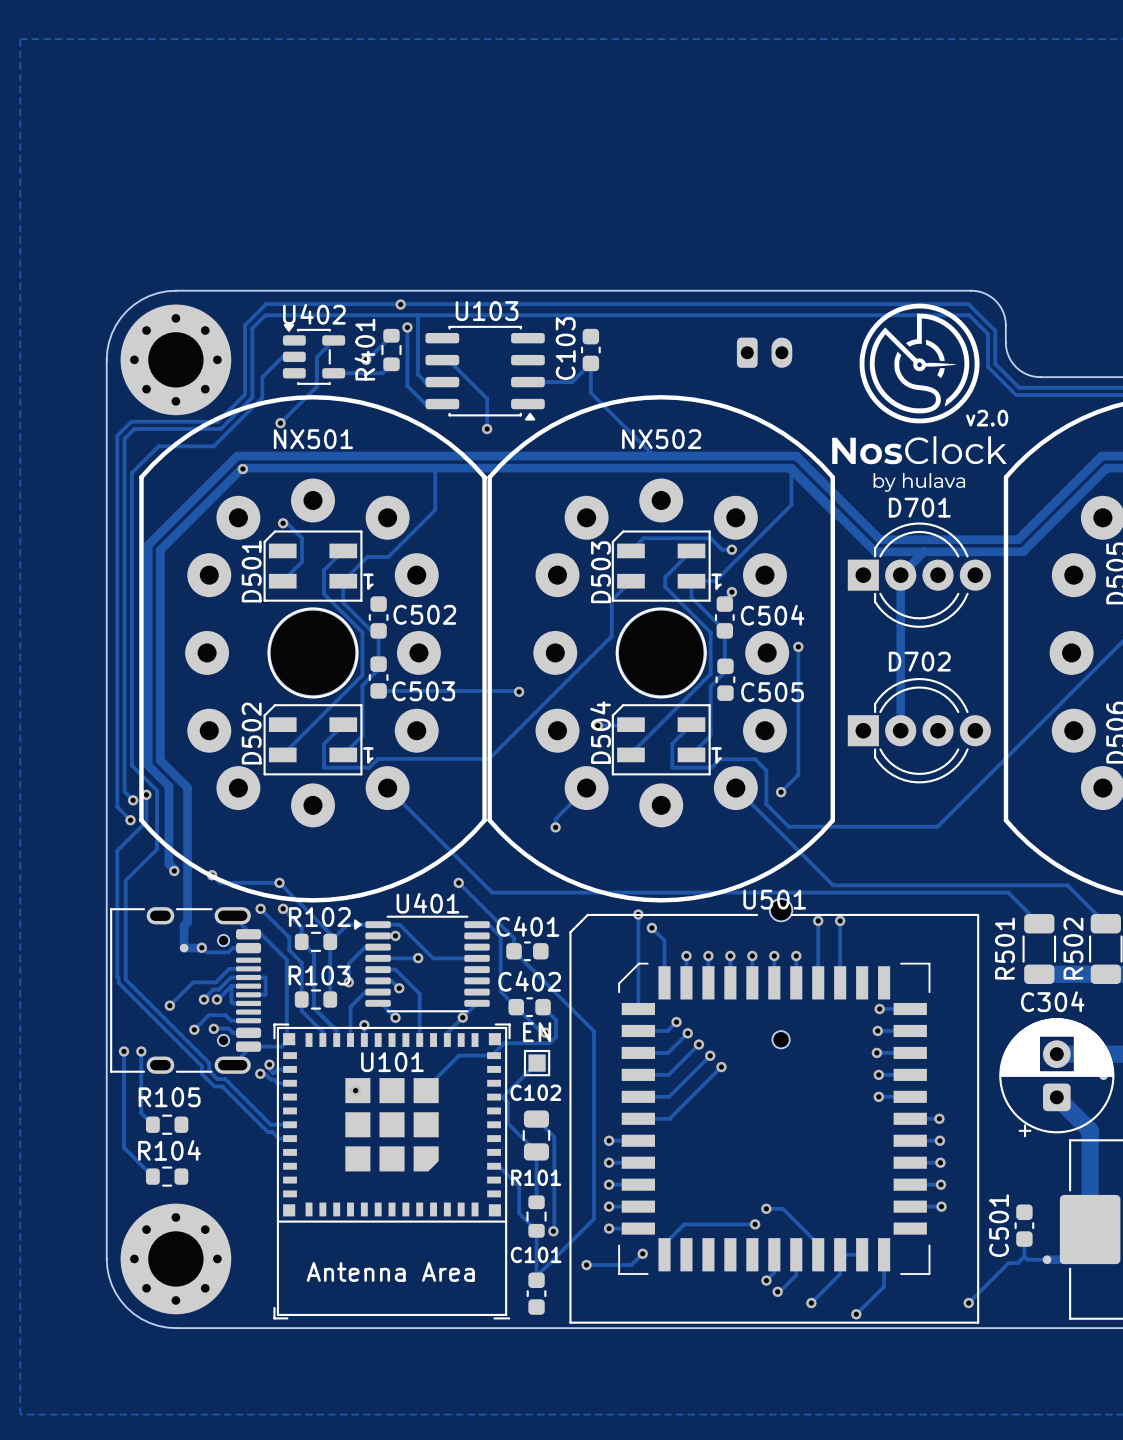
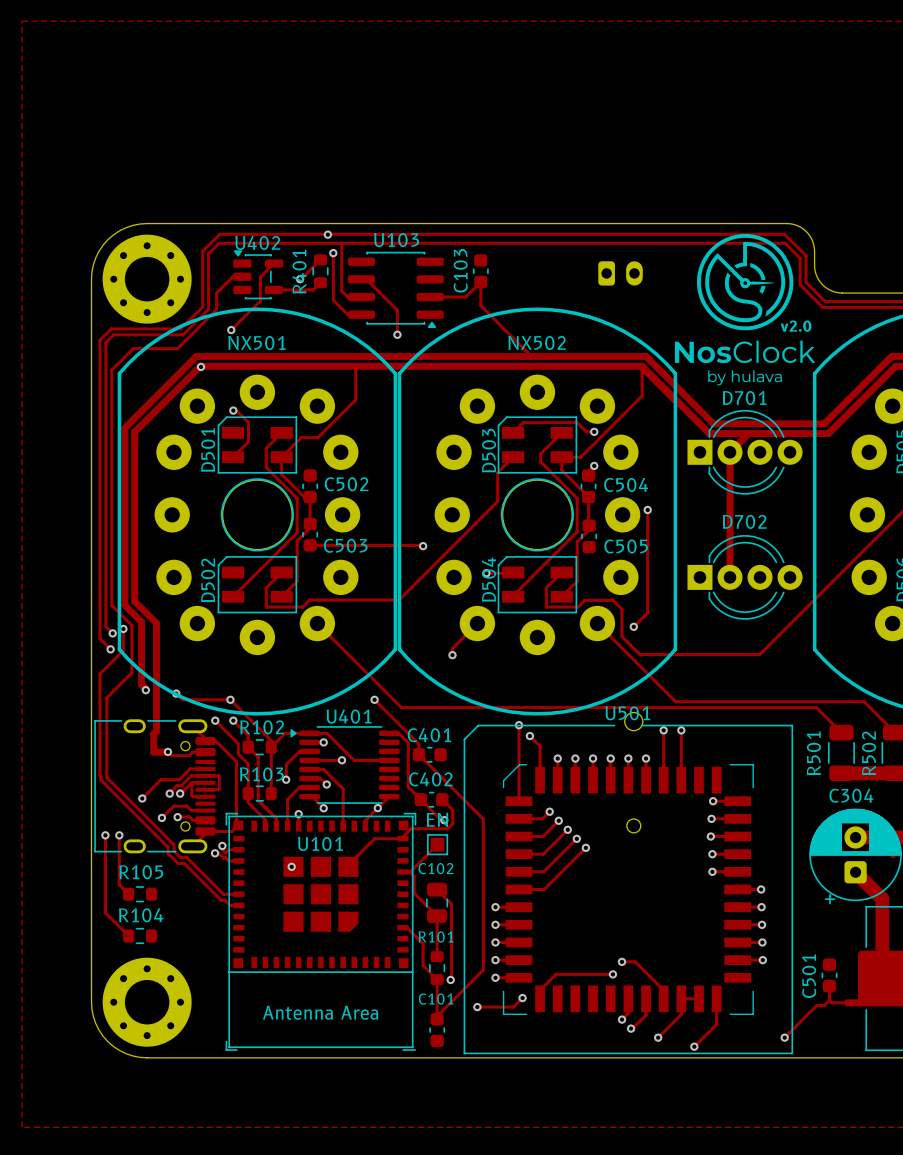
D501 text: 1 (368, 581) -> none
D503 text: 1 (716, 581) -> none
D502 text: 1 (368, 755) -> none
D504 text: 1 (716, 755) -> none

